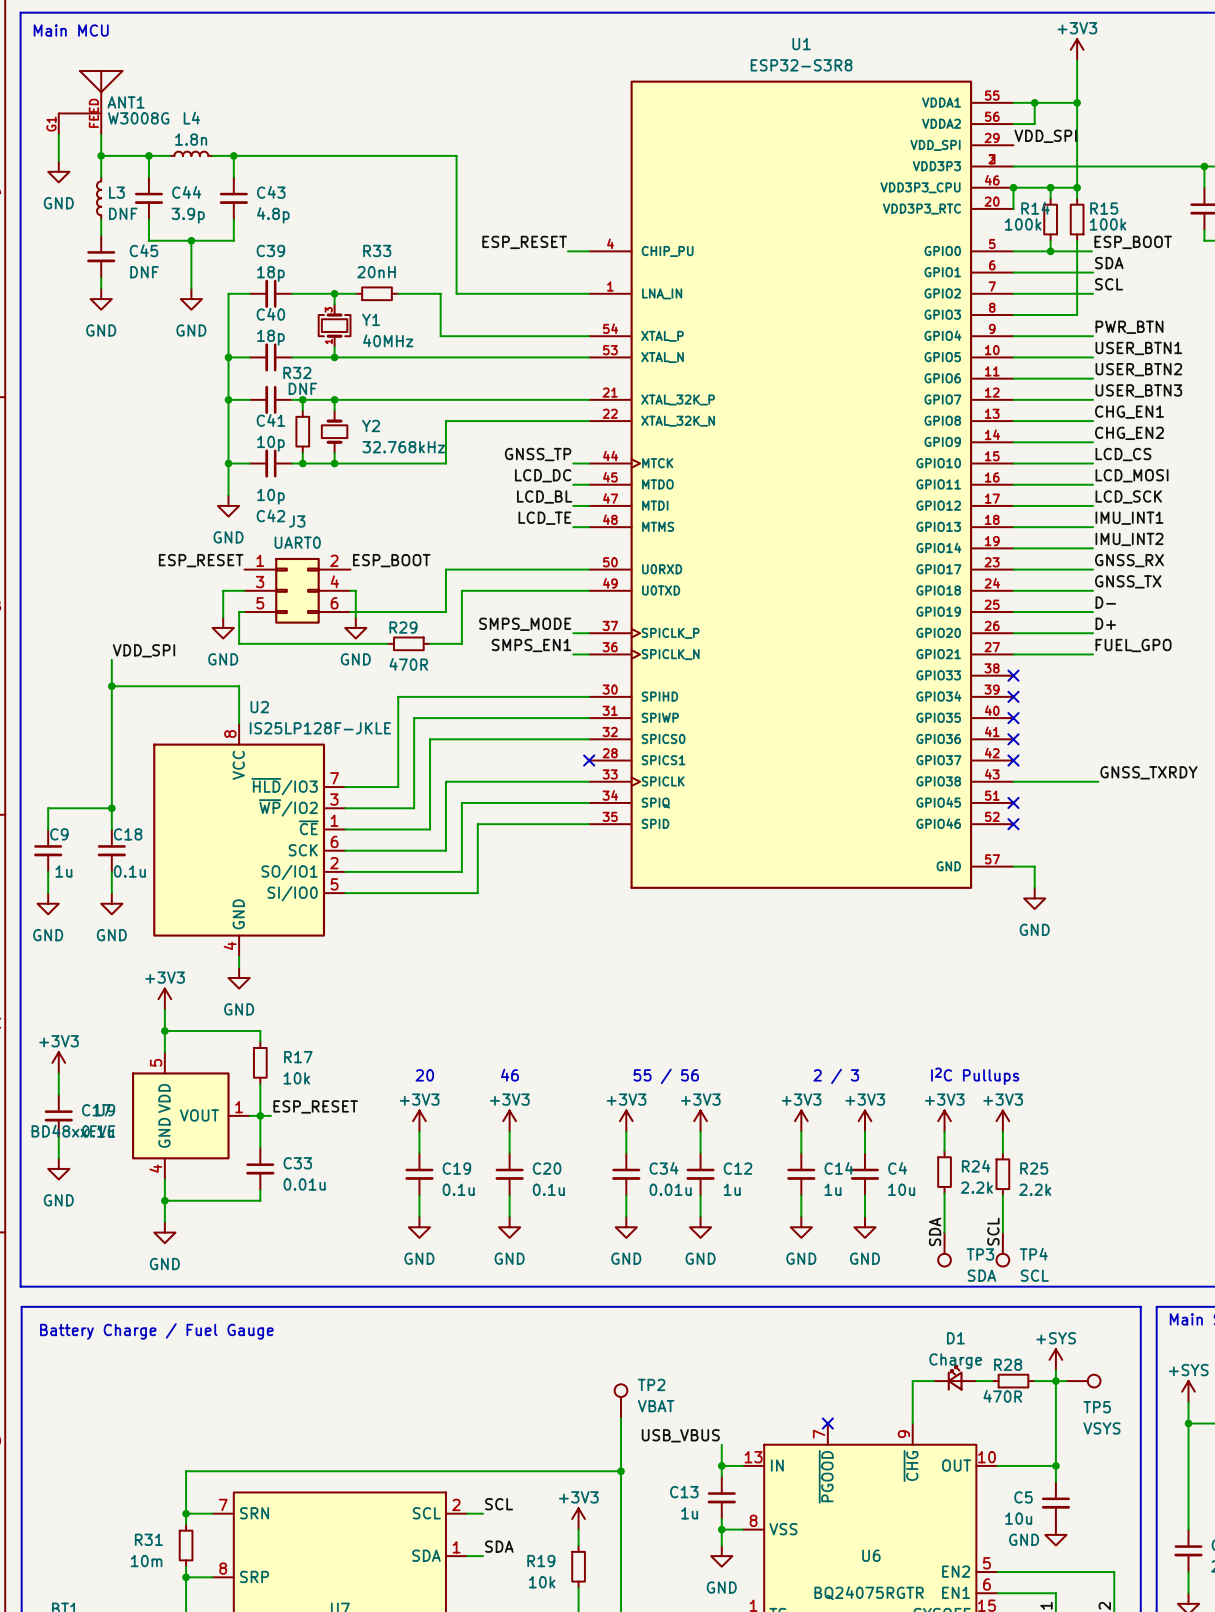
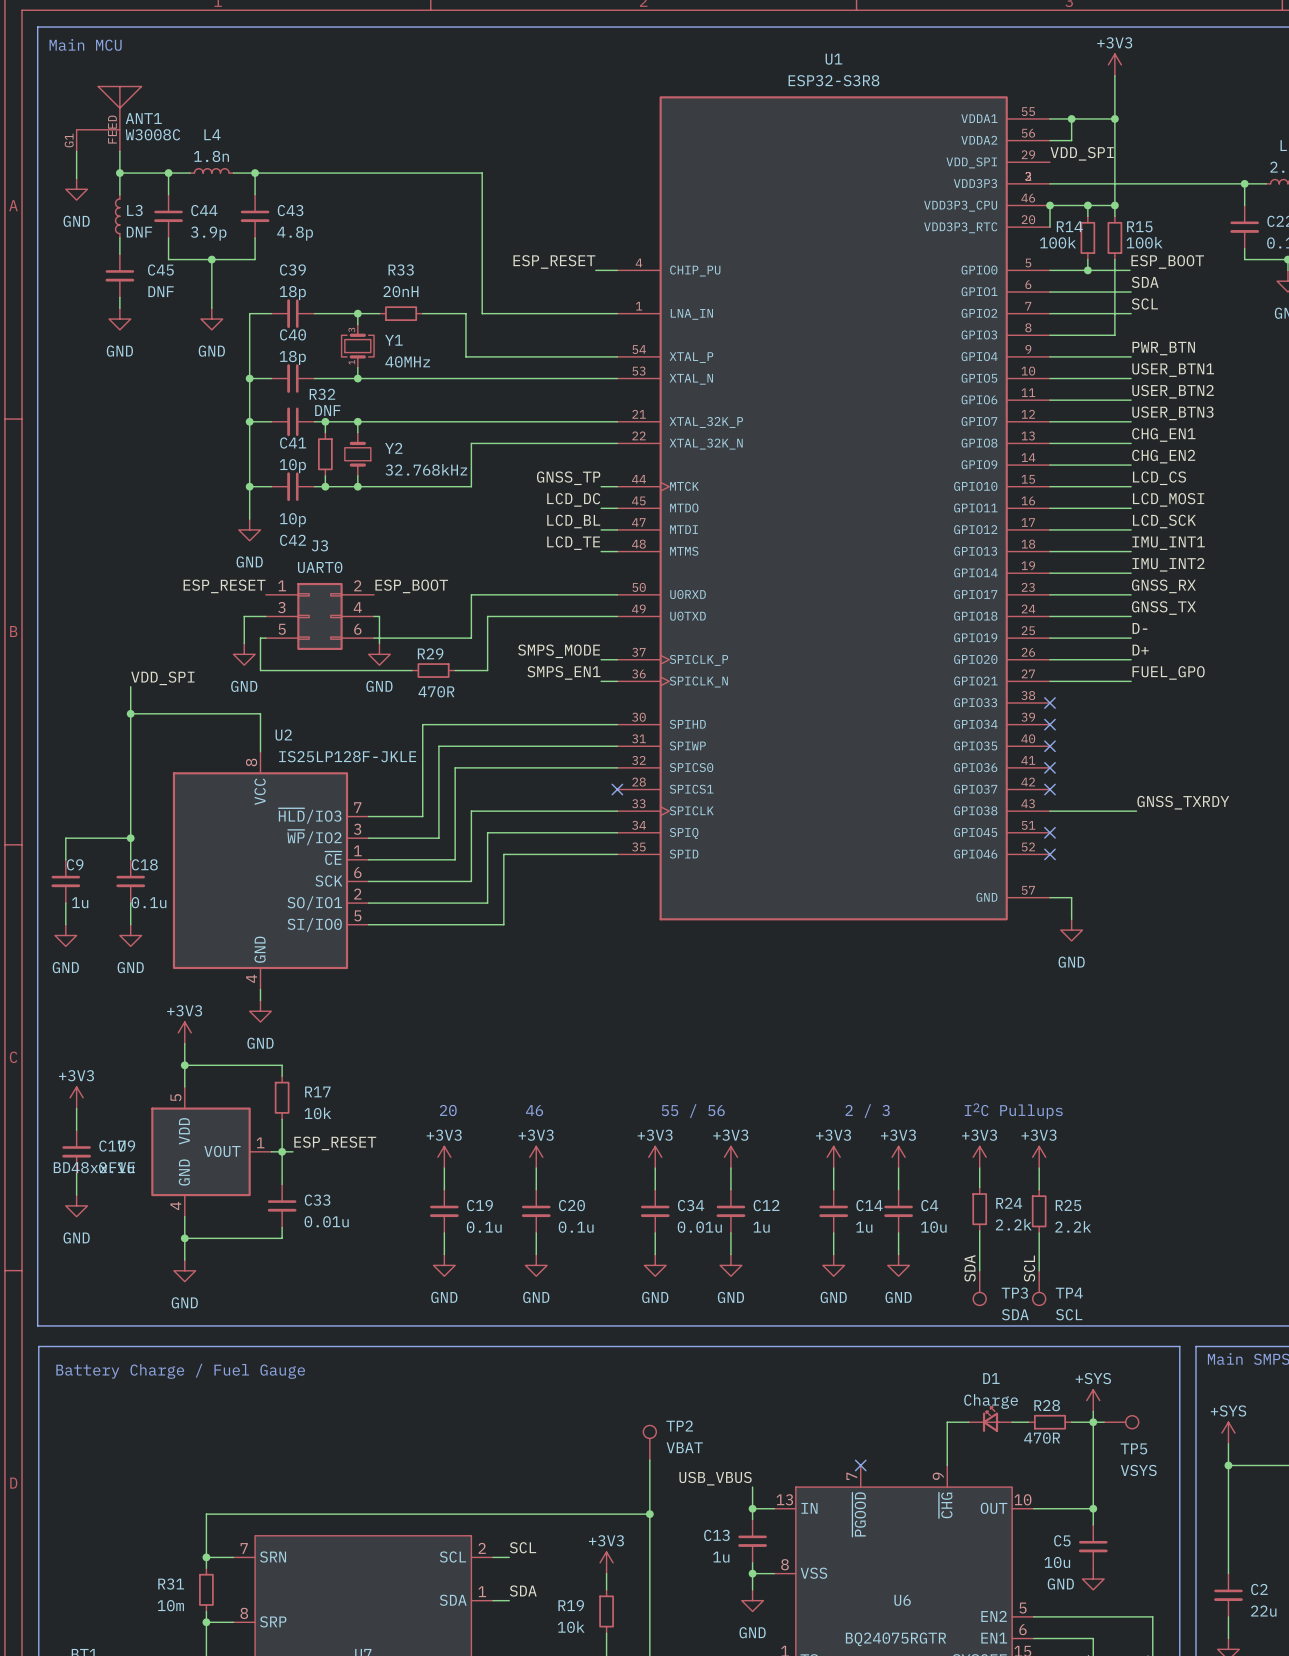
ANT1 value: W3008G (138, 118) -> W3008C (152, 134)

